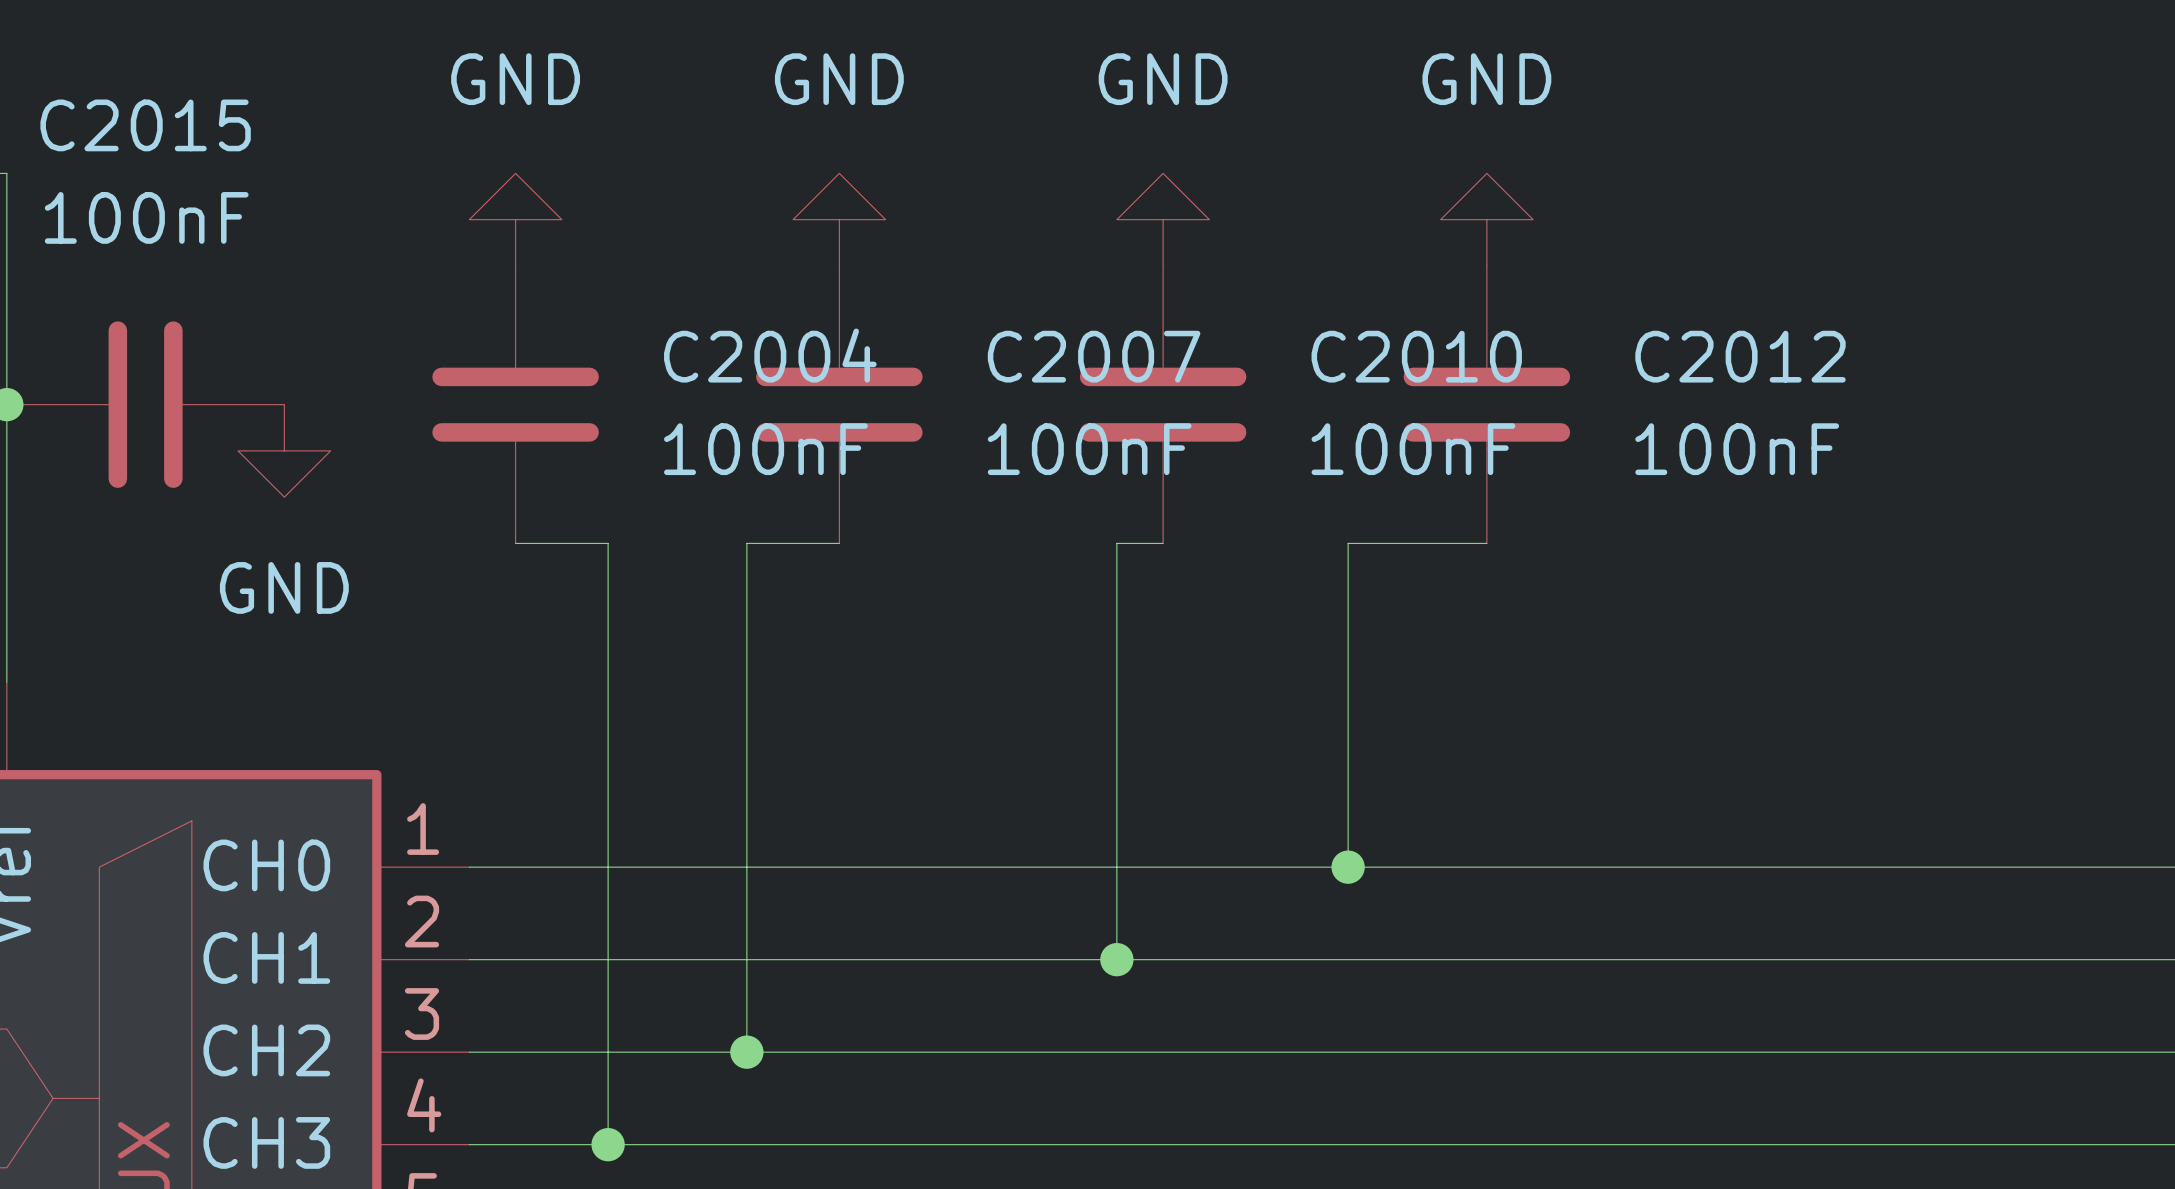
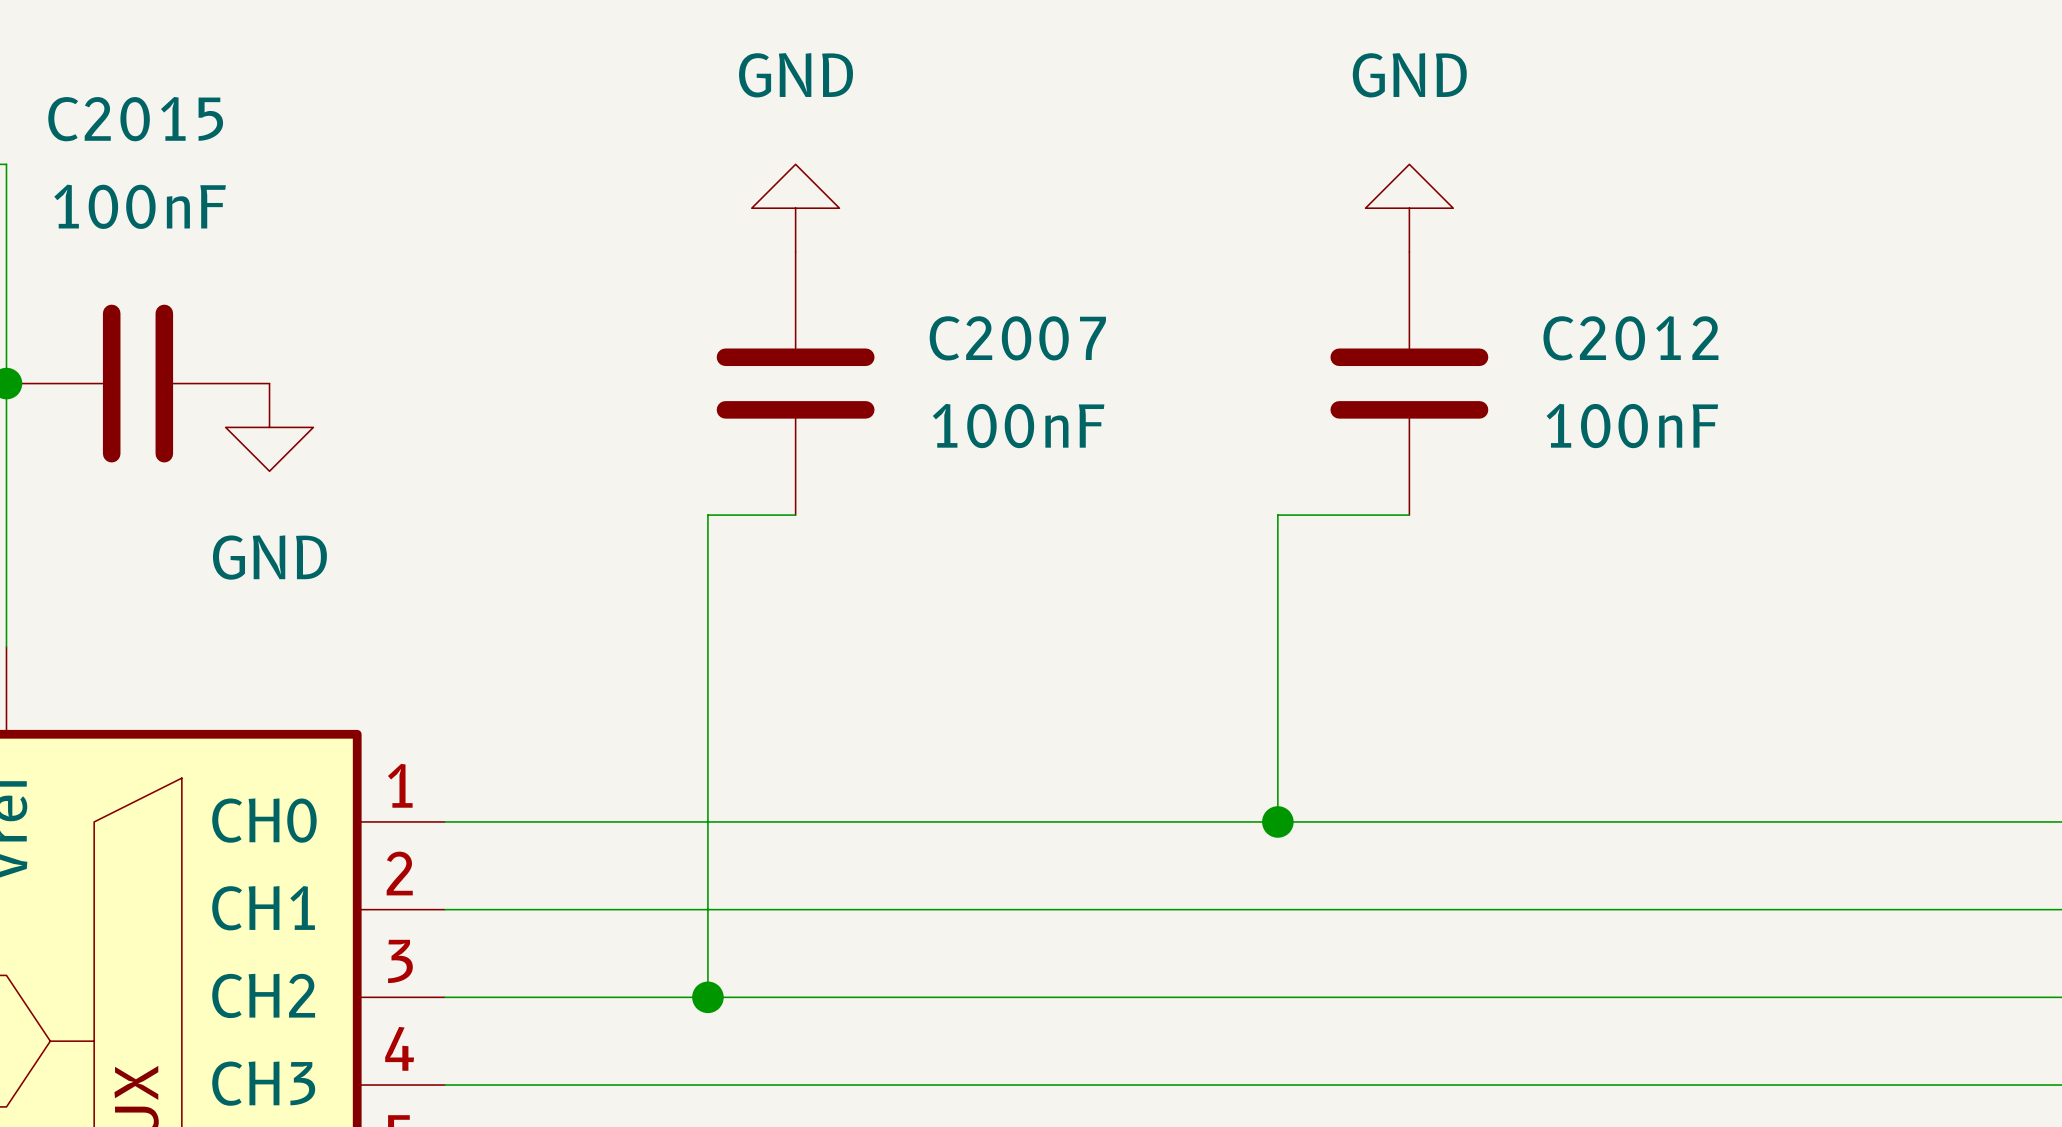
power symbol: GND (515, 219) -> none
power symbol: GND (1163, 219) -> none
C2004: 100nF (515, 404) -> none
C2010: 100nF (1163, 404) -> none
wire: (515, 543) (608, 543) (608, 1144) -> none
wire: (1163, 543) (1116, 543) (1116, 959) -> none
junction: (1116, 959) -> none
junction: (608, 1144) -> none

